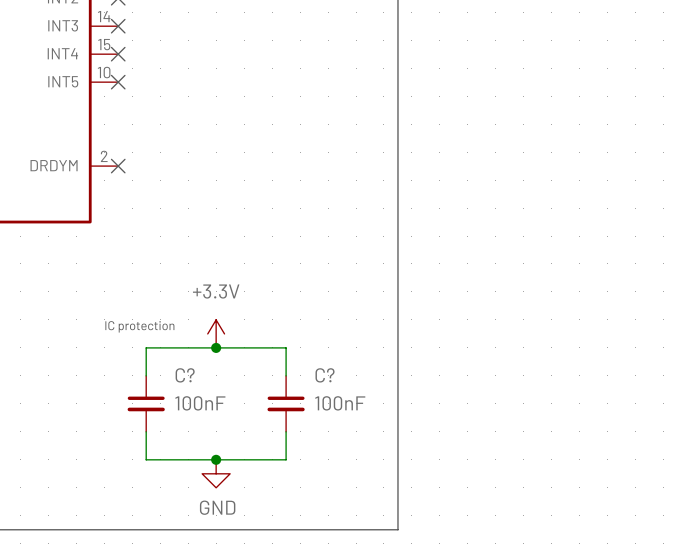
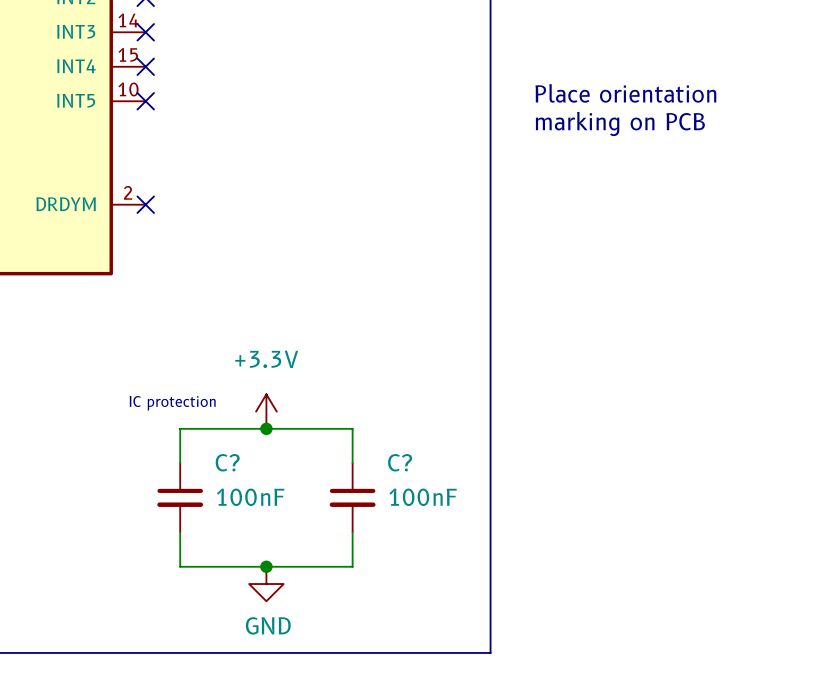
text: none -> Place orientation (625, 93)
text: none -> marking on PCB (620, 123)

